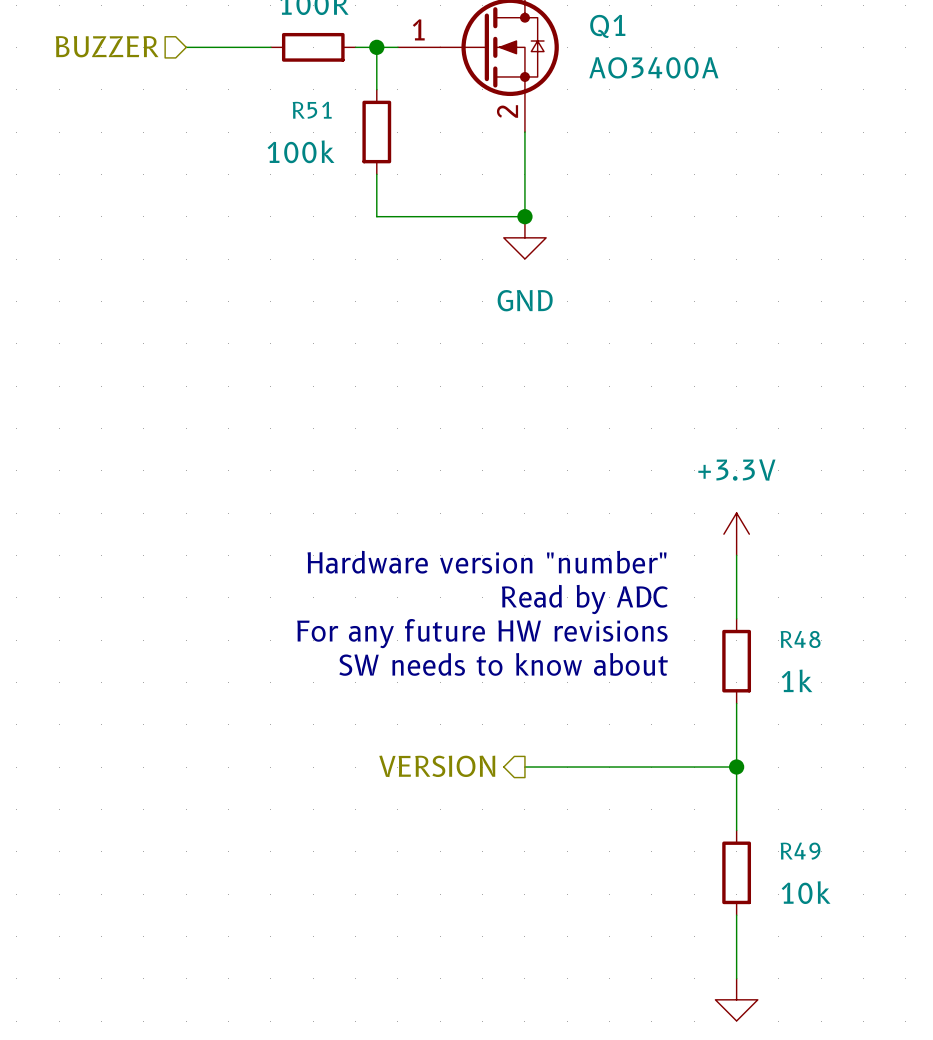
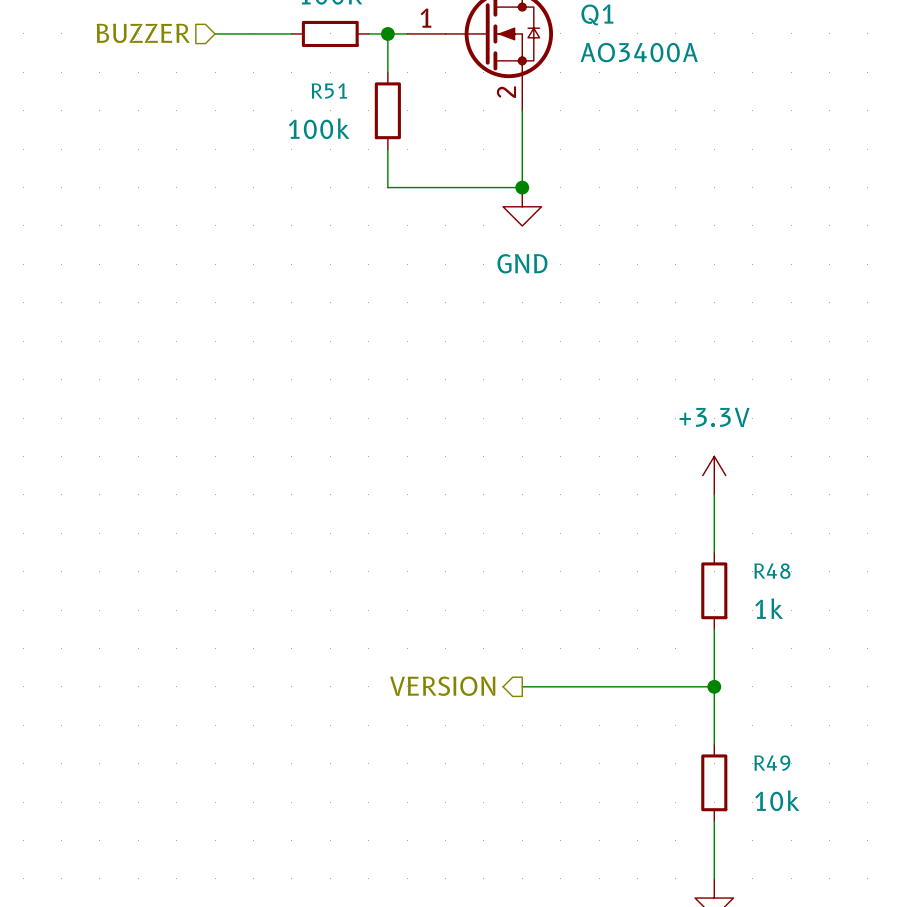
text: Hardware version "number" (487, 562) -> none
text: Read by ADC (584, 599) -> none
text: For any future HW revisions (482, 633) -> none
text: SW needs to know about (503, 664) -> none

